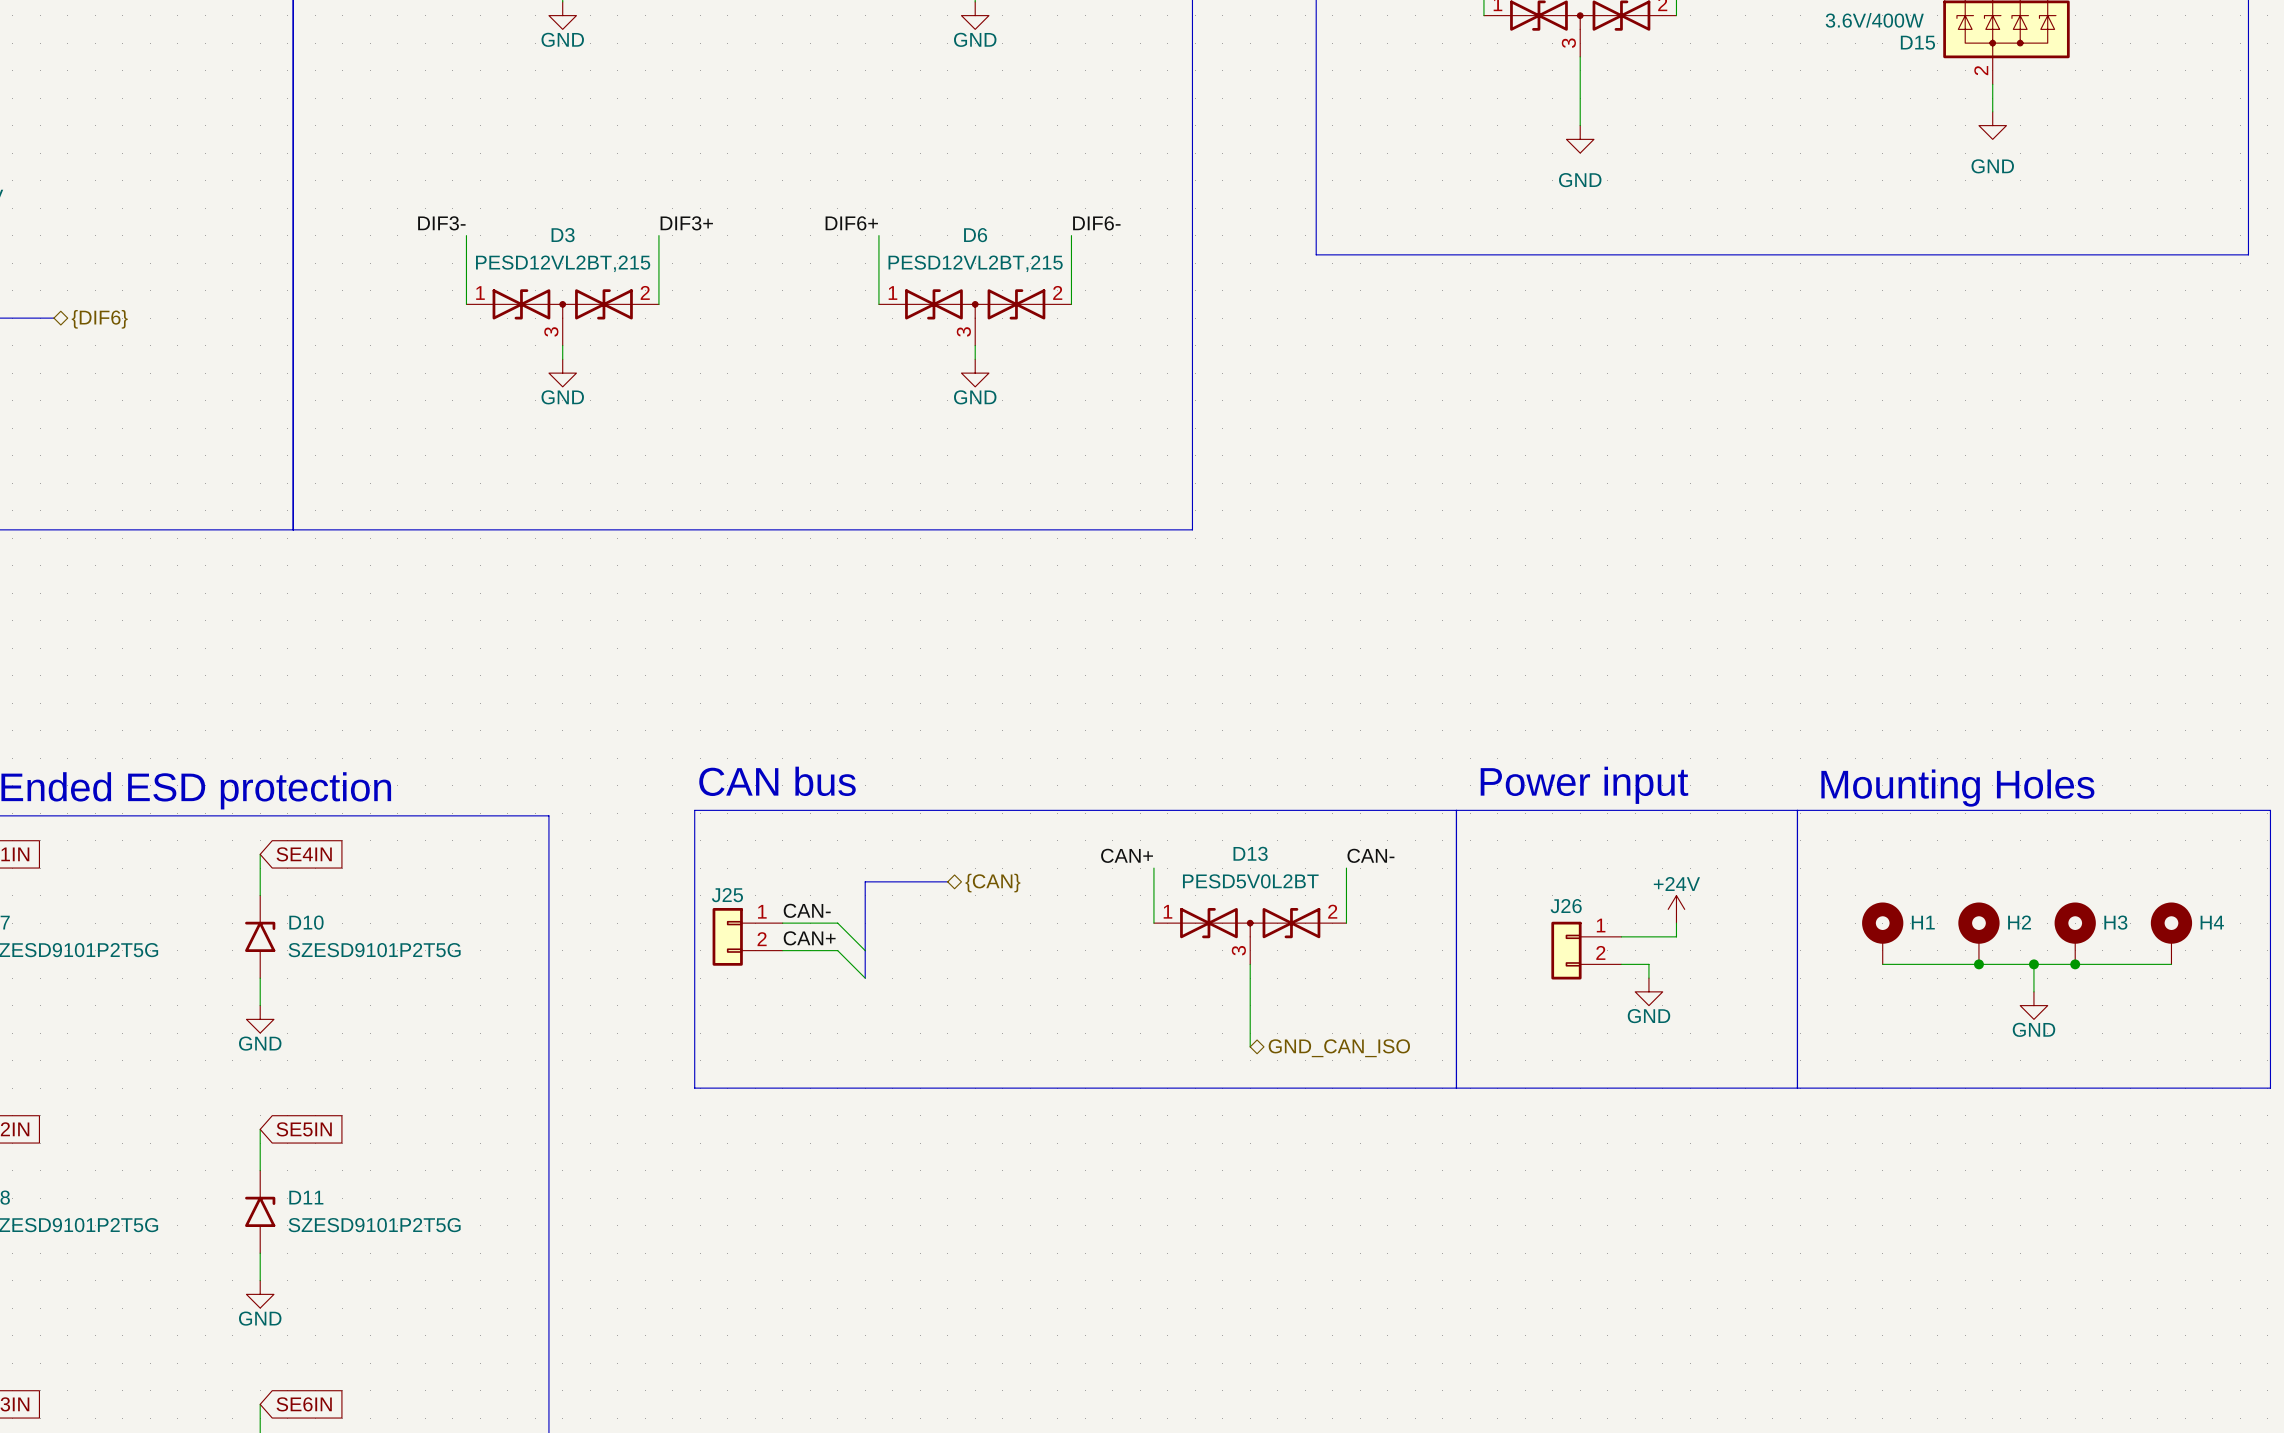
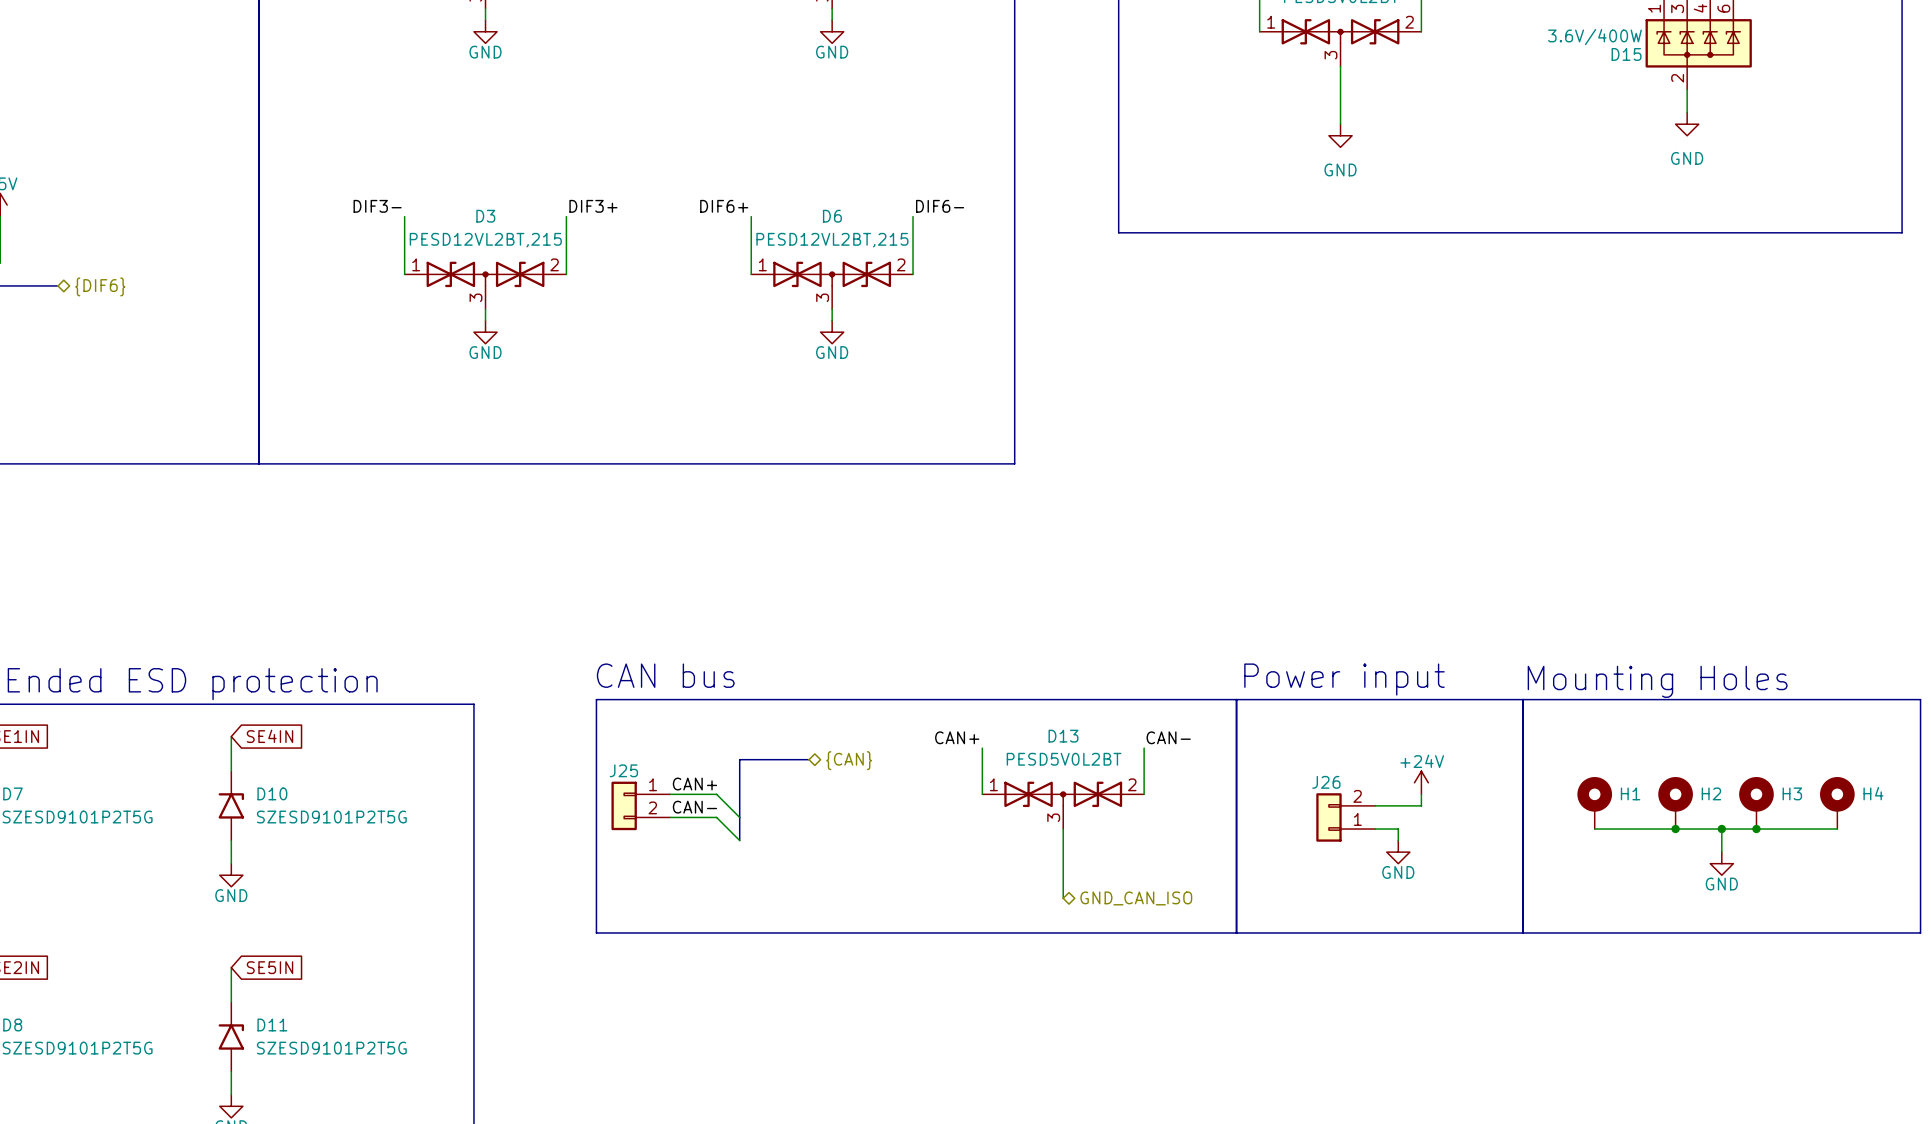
label: CAN- (807, 910) -> CAN+ (694, 784)
label: CAN+ (809, 938) -> CAN- (694, 807)
J26 flip: as is (1566, 950) -> up-down (1328, 817)

